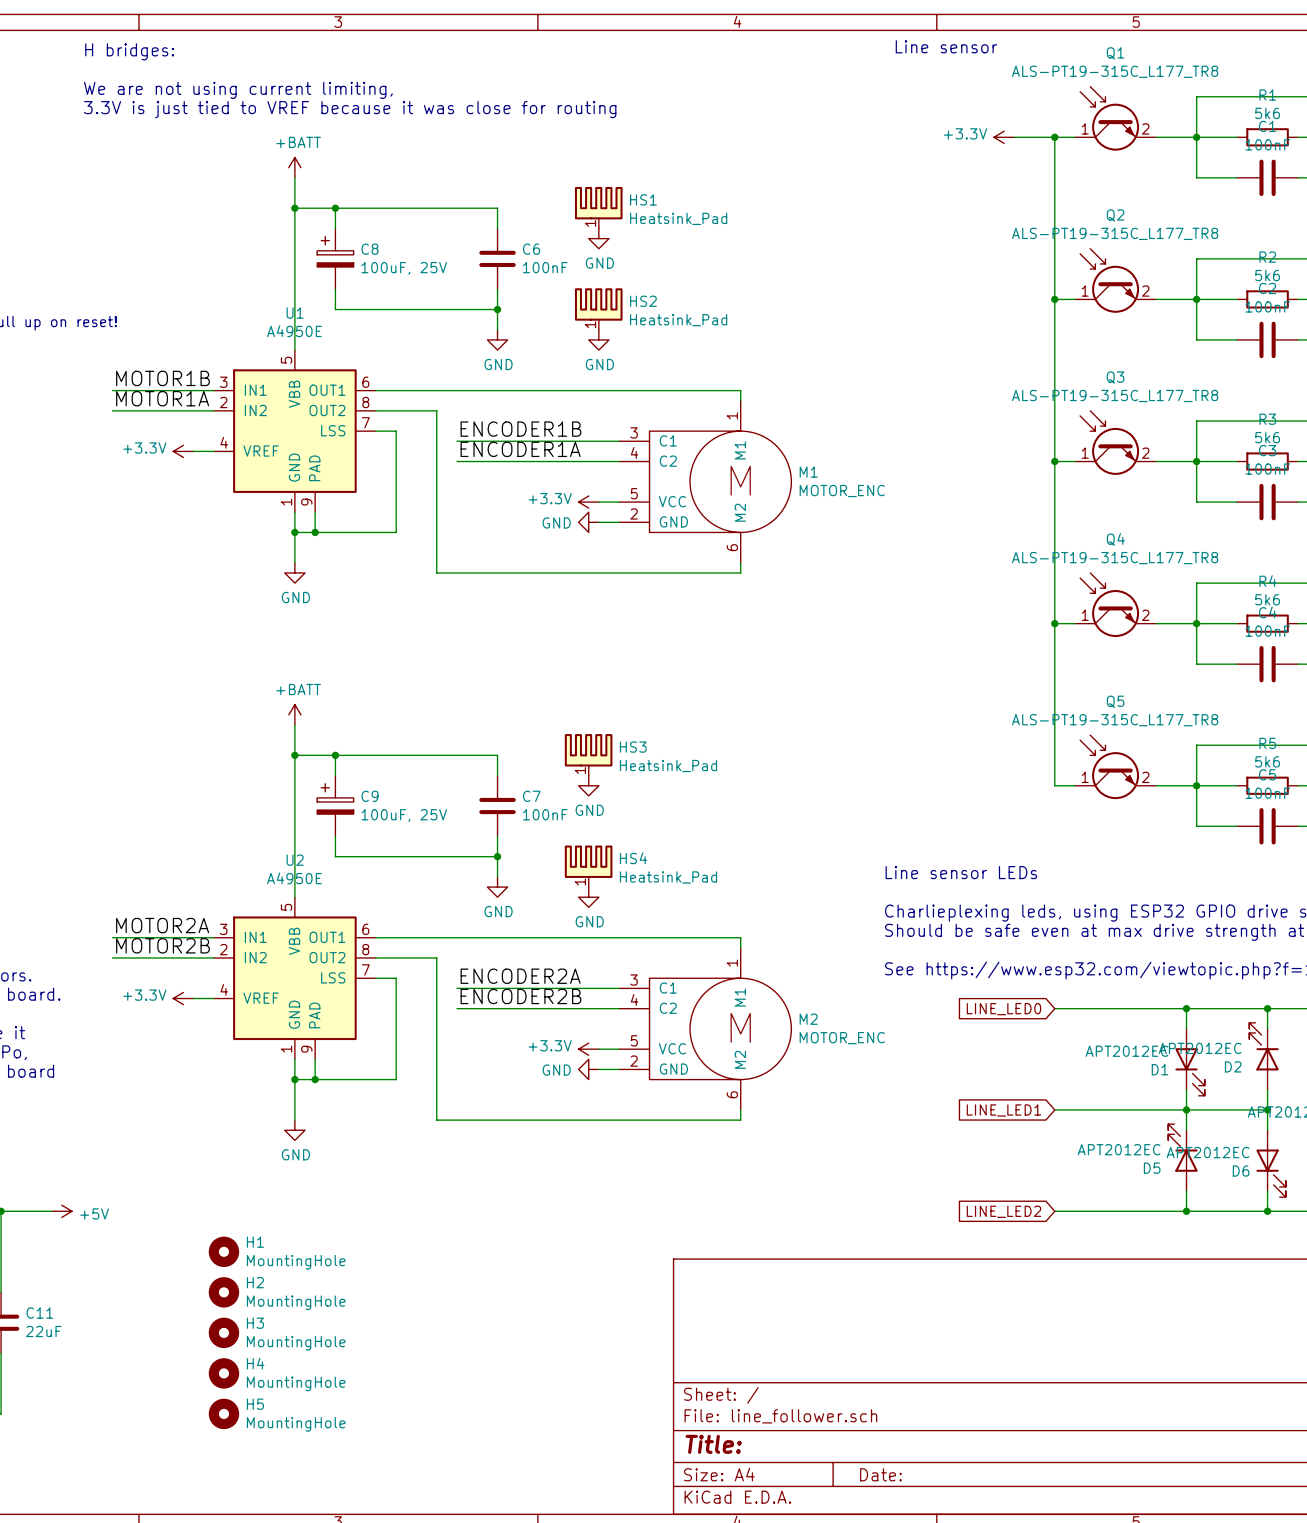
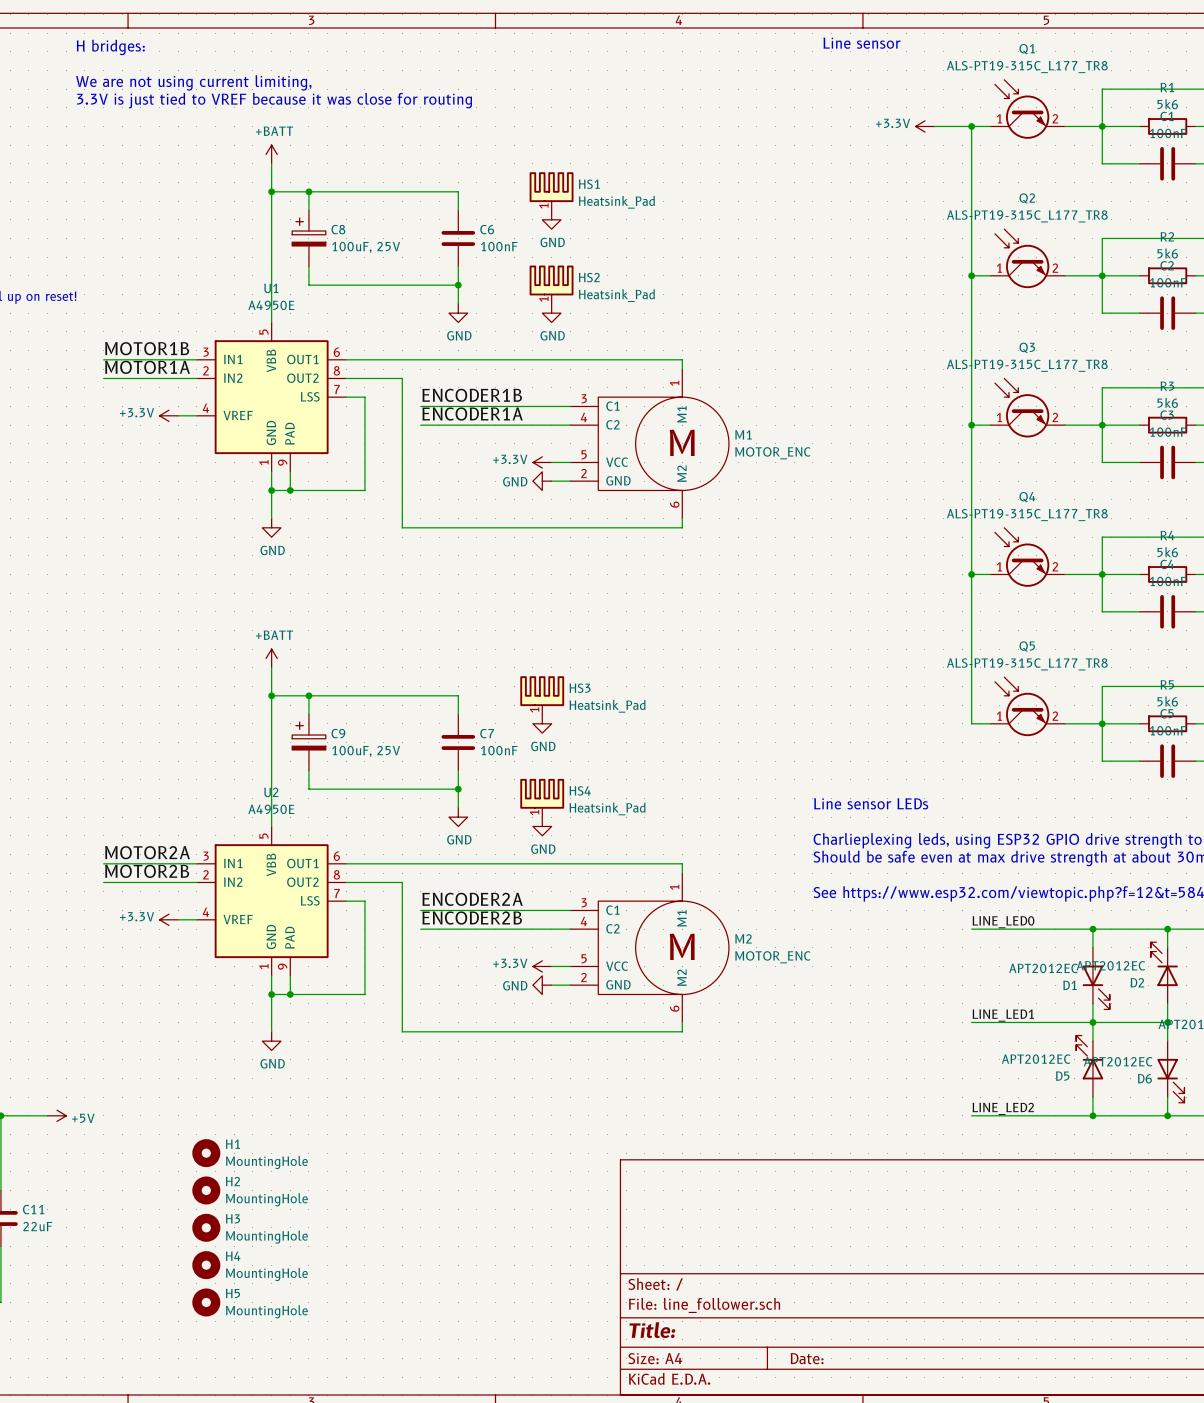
label: none -> LINE_LED0 (1003, 922)
global label: LINE_LED0 (1003, 1009) -> none
label: none -> LINE_LED1 (1003, 1015)
global label: LINE_LED1 (1003, 1110) -> none
label: none -> LINE_LED2 (1003, 1108)
global label: LINE_LED2 (1003, 1211) -> none

